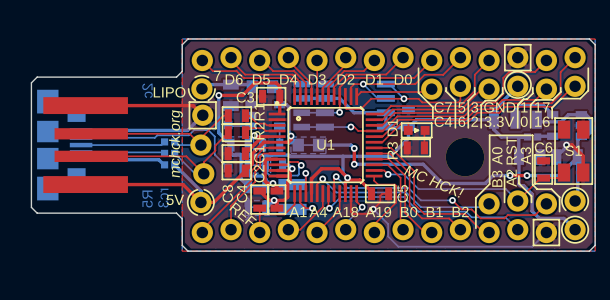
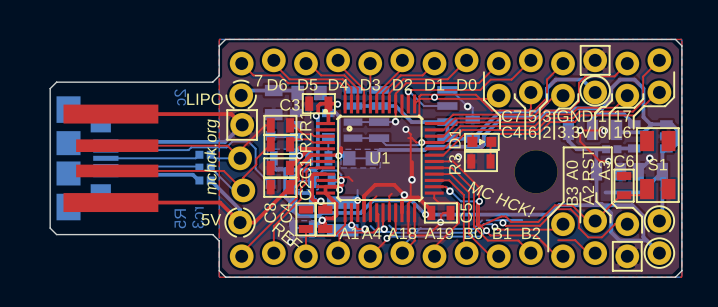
bottom track: (363, 84) (377, 98) -> (408, 91) (423, 106) (438, 106)
via: (363, 84) -> none
via: none -> (408, 91)
bottom track: (517, 86) (493, 110) (493, 119) (416, 119) -> (595, 92) (582, 79) (555, 79) (547, 88) (547, 102) (537, 111) (500, 111) (481, 129)
via: none -> (434, 97)
top track: (218, 95) (242, 95) (254, 82) (276, 82) (279, 86) (279, 96) -> none
bottom track: (218, 95) (218, 132) (231, 145) -> none
via: (218, 95) -> none
top track: none -> (337, 104) (320, 103) (316, 115)
via: none -> (337, 104)
bottom track: none -> (469, 104) (472, 107) (472, 119)
top track: (425, 102) (422, 102) (418, 98) (371, 98) (361, 108) (346, 108) (345, 105) -> (491, 110) (475, 94) (420, 94) (419, 114) (417, 116) (404, 116) (401, 113)
via: none -> (316, 115)
top track: none -> (405, 129) (410, 134) (410, 201) (408, 203) (408, 212)
via: none -> (405, 129)
via: none -> (580, 130)
top track: none -> (604, 130) (580, 130) (580, 141) (599, 161) (608, 161)
via: none -> (604, 130)
bottom track: (324, 127) (350, 127) -> (379, 138) (386, 145) (419, 145) (421, 142)
via: (350, 127) -> none
bottom track: (408, 127) (408, 138) (390, 156) (268, 155) -> (316, 115) (317, 117) (317, 166) (315, 169)
via: none -> (421, 142)
via: (254, 135) -> none
via: (291, 136) -> none
via: none -> (299, 155)
via: none -> (338, 155)
via: none -> (458, 156)
bottom track: (318, 145) (350, 145) (354, 148) -> (371, 158) (380, 149) (424, 149) (428, 146) (481, 146) (483, 144) (483, 135) (502, 117) (540, 117) (545, 111) (570, 111) (573, 108) (602, 108) (611, 99) (611, 88) (620, 79) (634, 79) (643, 88) (643, 117) (651, 124)
top track: (566, 145) (572, 145) (583, 156) (583, 172) -> none
via: none -> (608, 161)
via: (354, 148) -> none
bottom track: (343, 156) (343, 173) (347, 177) -> none
via: none -> (341, 180)
bottom track: (354, 164) (423, 164) (442, 183) (485, 183) (493, 175) (510, 175) -> none
bottom track: (265, 165) (265, 171) (269, 175) (297, 175) (301, 165) -> (312, 180) (322, 170) (337, 170) (341, 174) (341, 180)
via: (301, 165) -> none
via: (292, 168) -> none
top track: none -> (325, 186) (325, 193) (336, 204) (336, 215) (333, 218) (325, 218) (321, 222)
top track: (289, 170) (287, 197) (284, 200) (269, 200) (259, 190) -> none
bottom track: none -> (446, 186) (461, 201) (479, 201)
via: none -> (339, 189)
top track: (305, 173) (305, 182) -> none
via: (305, 173) -> none
bottom track: (388, 174) (403, 174) (418, 189) (505, 189) (517, 200) -> none
top track: (510, 175) (527, 175) -> none
via: (510, 175) -> none
via: (527, 175) -> none
top track: (277, 176) (289, 176) -> none
bottom track: (336, 176) (347, 187) (408, 187) (420, 200) -> none
via: (336, 176) -> none
bottom track: (322, 178) (336, 192) (406, 192) (420, 207) (485, 207) (489, 203) -> none
via: (322, 178) -> none
via: none -> (357, 200)
top track: none -> (479, 201) (476, 204) (476, 224) (479, 226) (501, 216) (505, 216) (511, 221) (538, 221) (554, 205) (572, 205) (587, 220) (595, 220)
via: none -> (479, 201)
bottom track: none -> (293, 205) (293, 210) (298, 216) (318, 216) (321, 212) (360, 212) (373, 200) (411, 200) (425, 214) (549, 214) (559, 205) (632, 205) (643, 216) (643, 237) (646, 240)
top track: (322, 193) (322, 207) (300, 229) (288, 229) -> (376, 212) (378, 214) (378, 227) (373, 232) (341, 232) (339, 234) (338, 253)
via: none -> (425, 214)
bottom track: none -> (482, 220) (473, 228) (392, 228) (389, 225)
top track: (452, 200) (461, 209) (471, 209) (480, 218) (504, 218) (507, 215) (535, 215) (546, 203) -> (502, 222) (505, 225) (539, 225) (556, 209) (570, 209) (579, 217) (579, 228) (588, 237) (601, 237) (615, 224) (627, 224)
via: (452, 200) -> none
top track: (356, 201) (362, 207) -> (414, 221) (414, 240) (402, 253)
via: none -> (440, 222)
via: none -> (502, 222)
top track: none -> (563, 224) (557, 229) (497, 229) (494, 227)
via: none -> (351, 225)
bottom track: none -> (370, 225) (376, 231) (390, 232) (475, 232) (483, 224) (492, 224) (494, 227)
via: none -> (494, 227)
via: (362, 207) -> none
bottom track: (329, 208) (340, 197) (403, 197) (418, 211) (466, 211) (471, 217) (505, 217) (517, 229) -> none
bottom track: (373, 209) (388, 224) (388, 236) (398, 246) (532, 246) (546, 232) -> none
via: (373, 209) -> none
bottom track: none -> (486, 230) (480, 236) (388, 236) (386, 238)
via: none -> (486, 230)
via: none -> (386, 238)
top track: none -> (558, 240) (575, 240) (588, 253) (595, 253)
via: none -> (290, 242)

